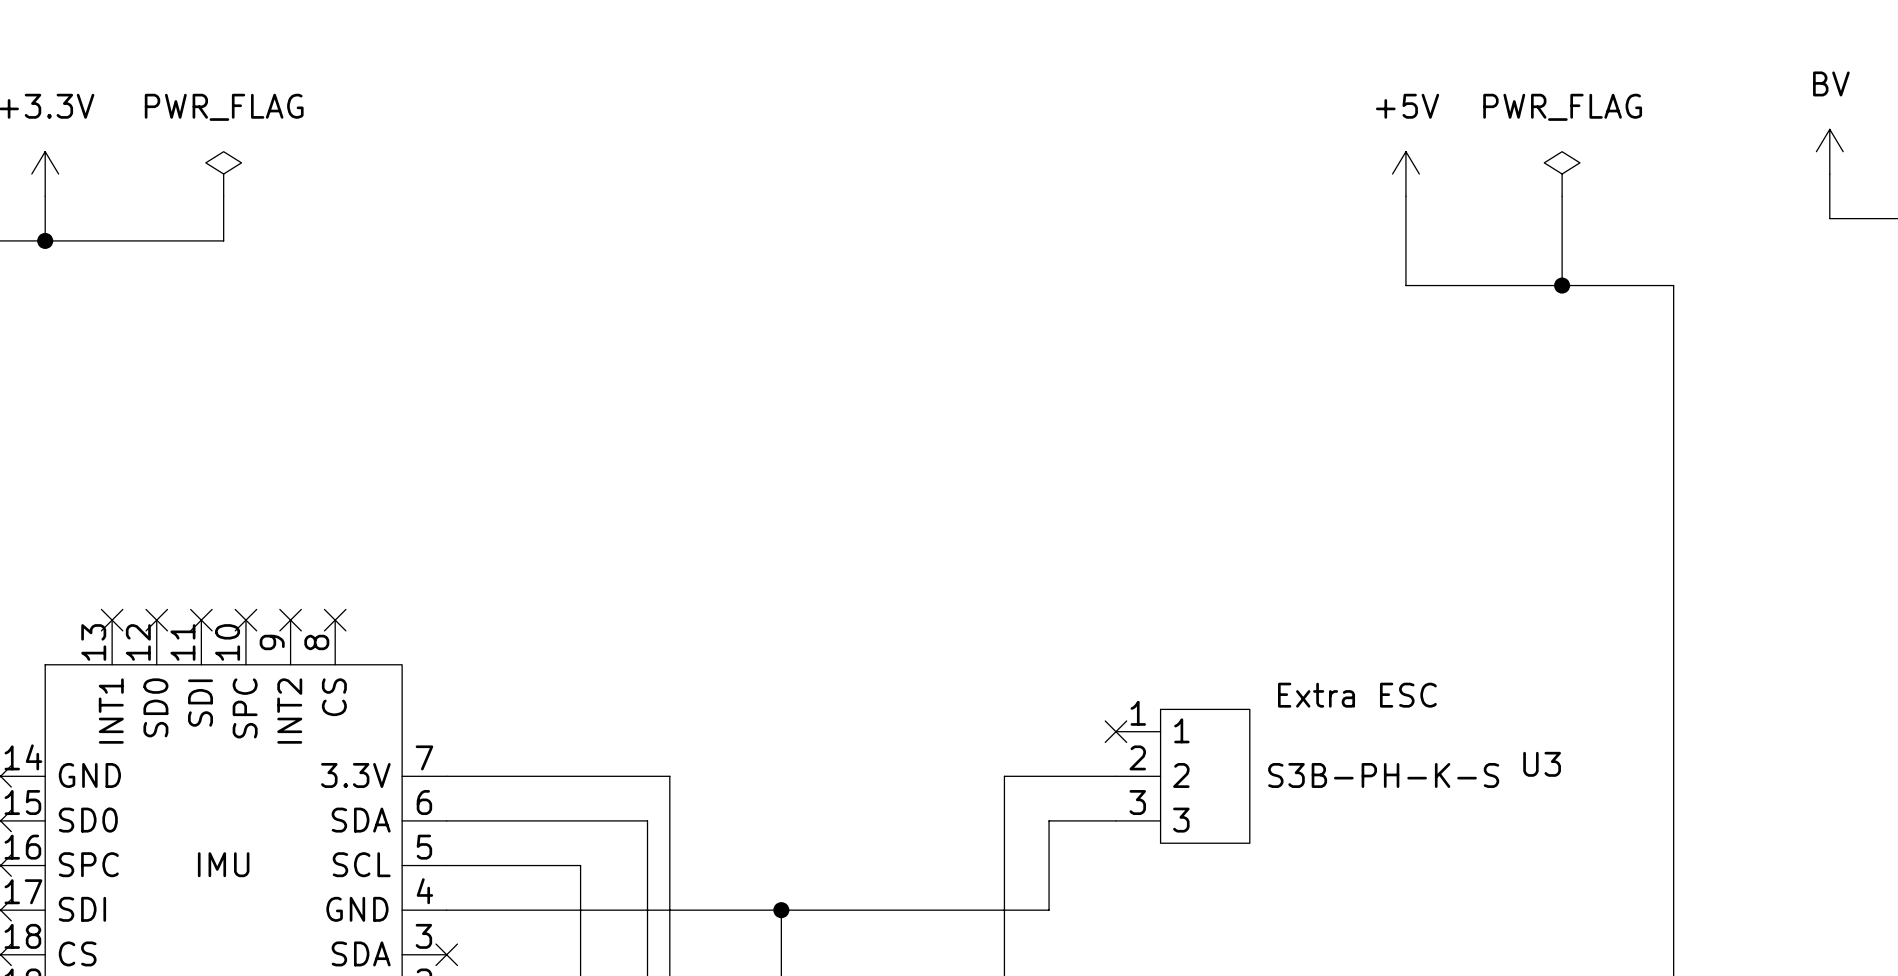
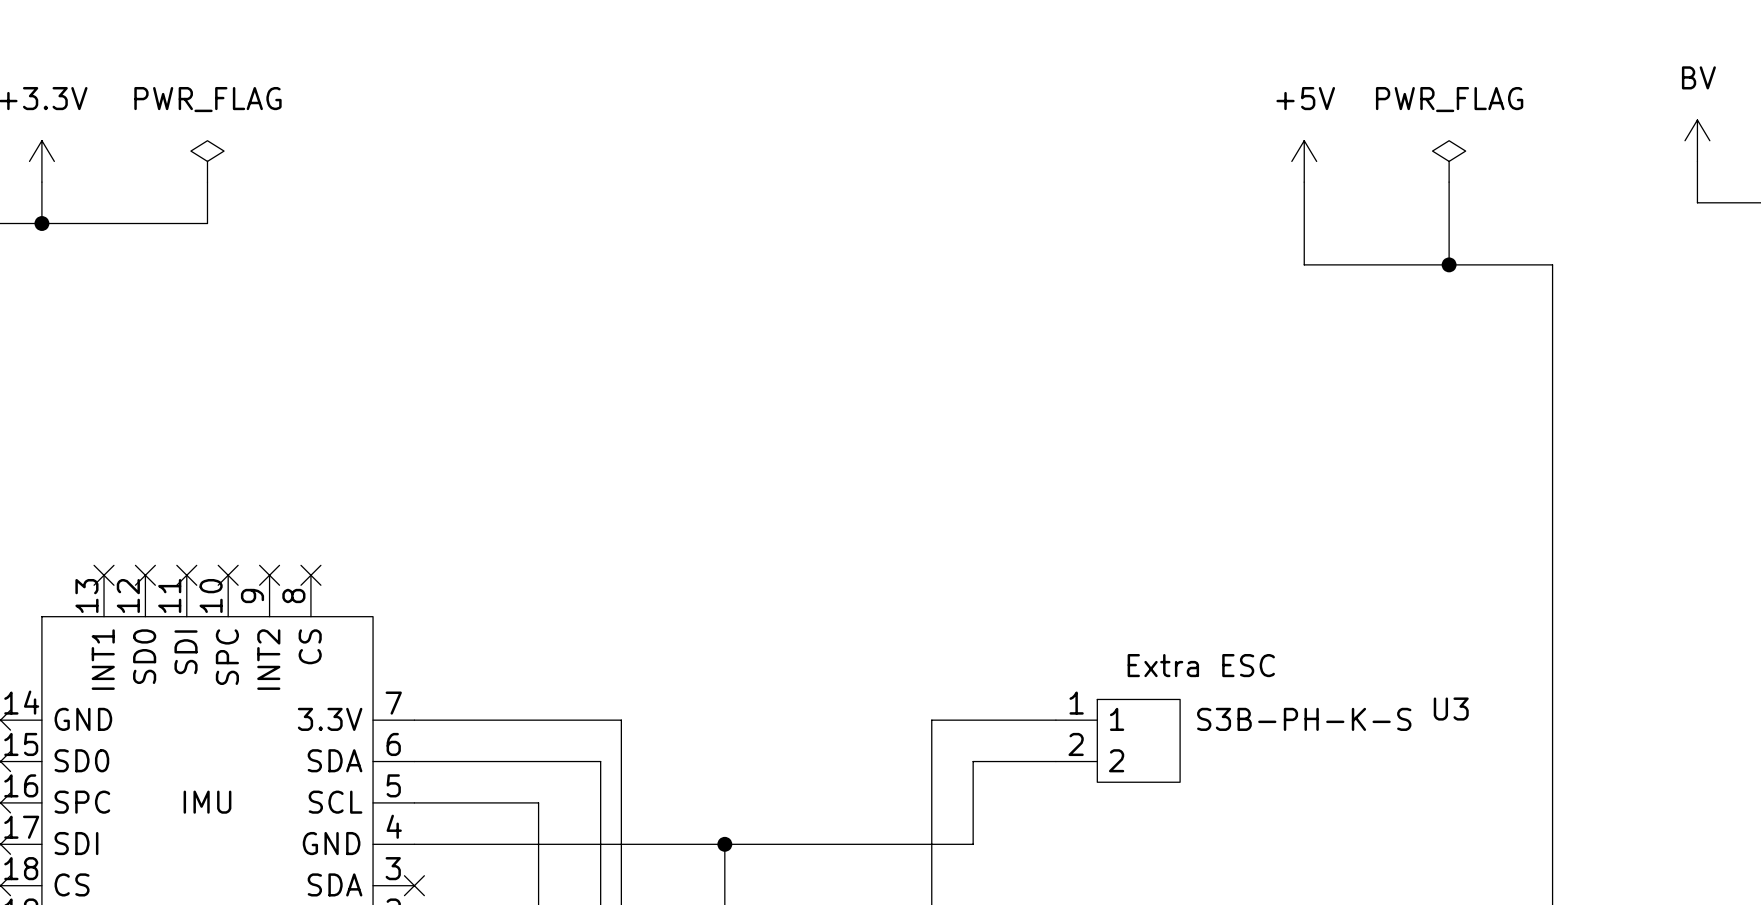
U3 text position: Extra ESC (1357, 695) -> Extra ESC (1201, 665)
U3 symbol: [1115, 709, 1250, 844] -> [1055, 699, 1181, 783]
no-connect mark: (1115, 731) -> none

